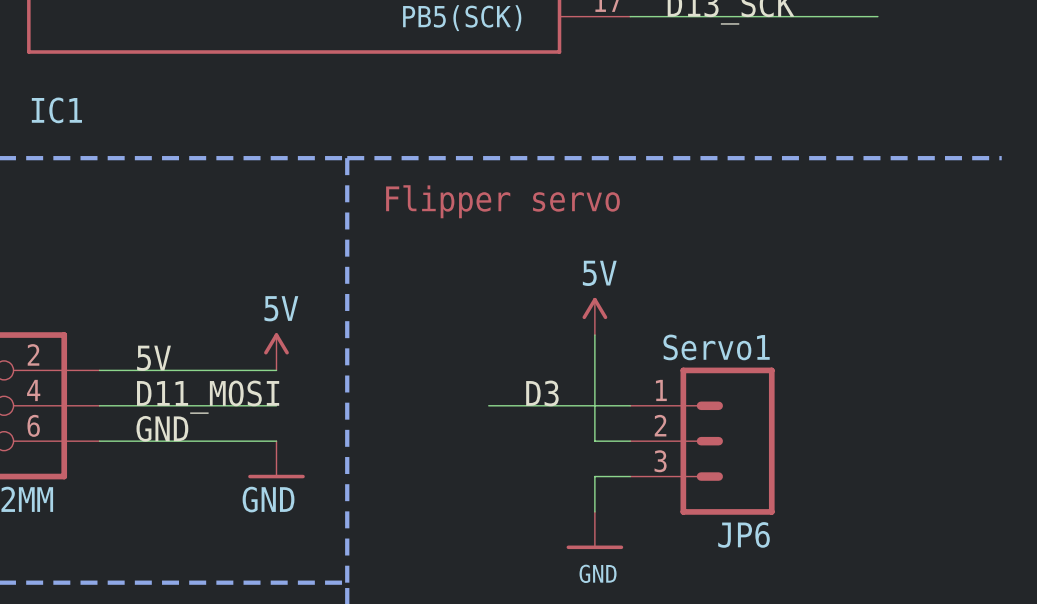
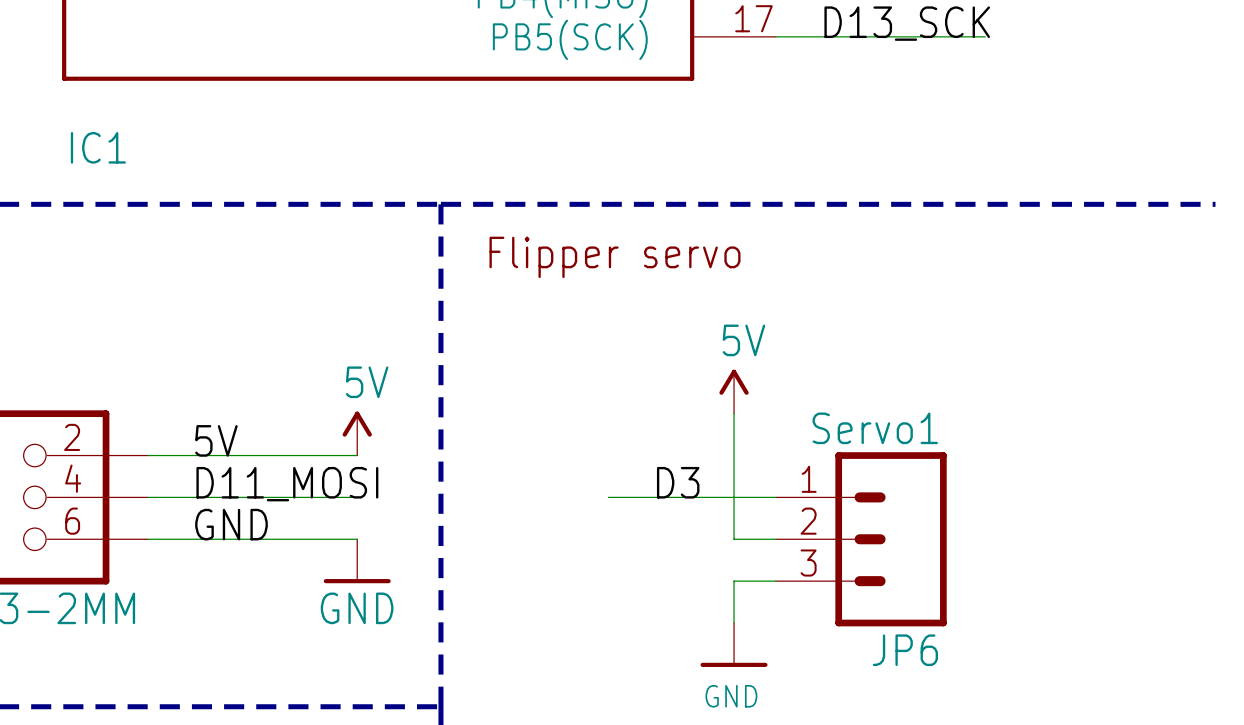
wire: (807, 16) (877, 16) -> none

